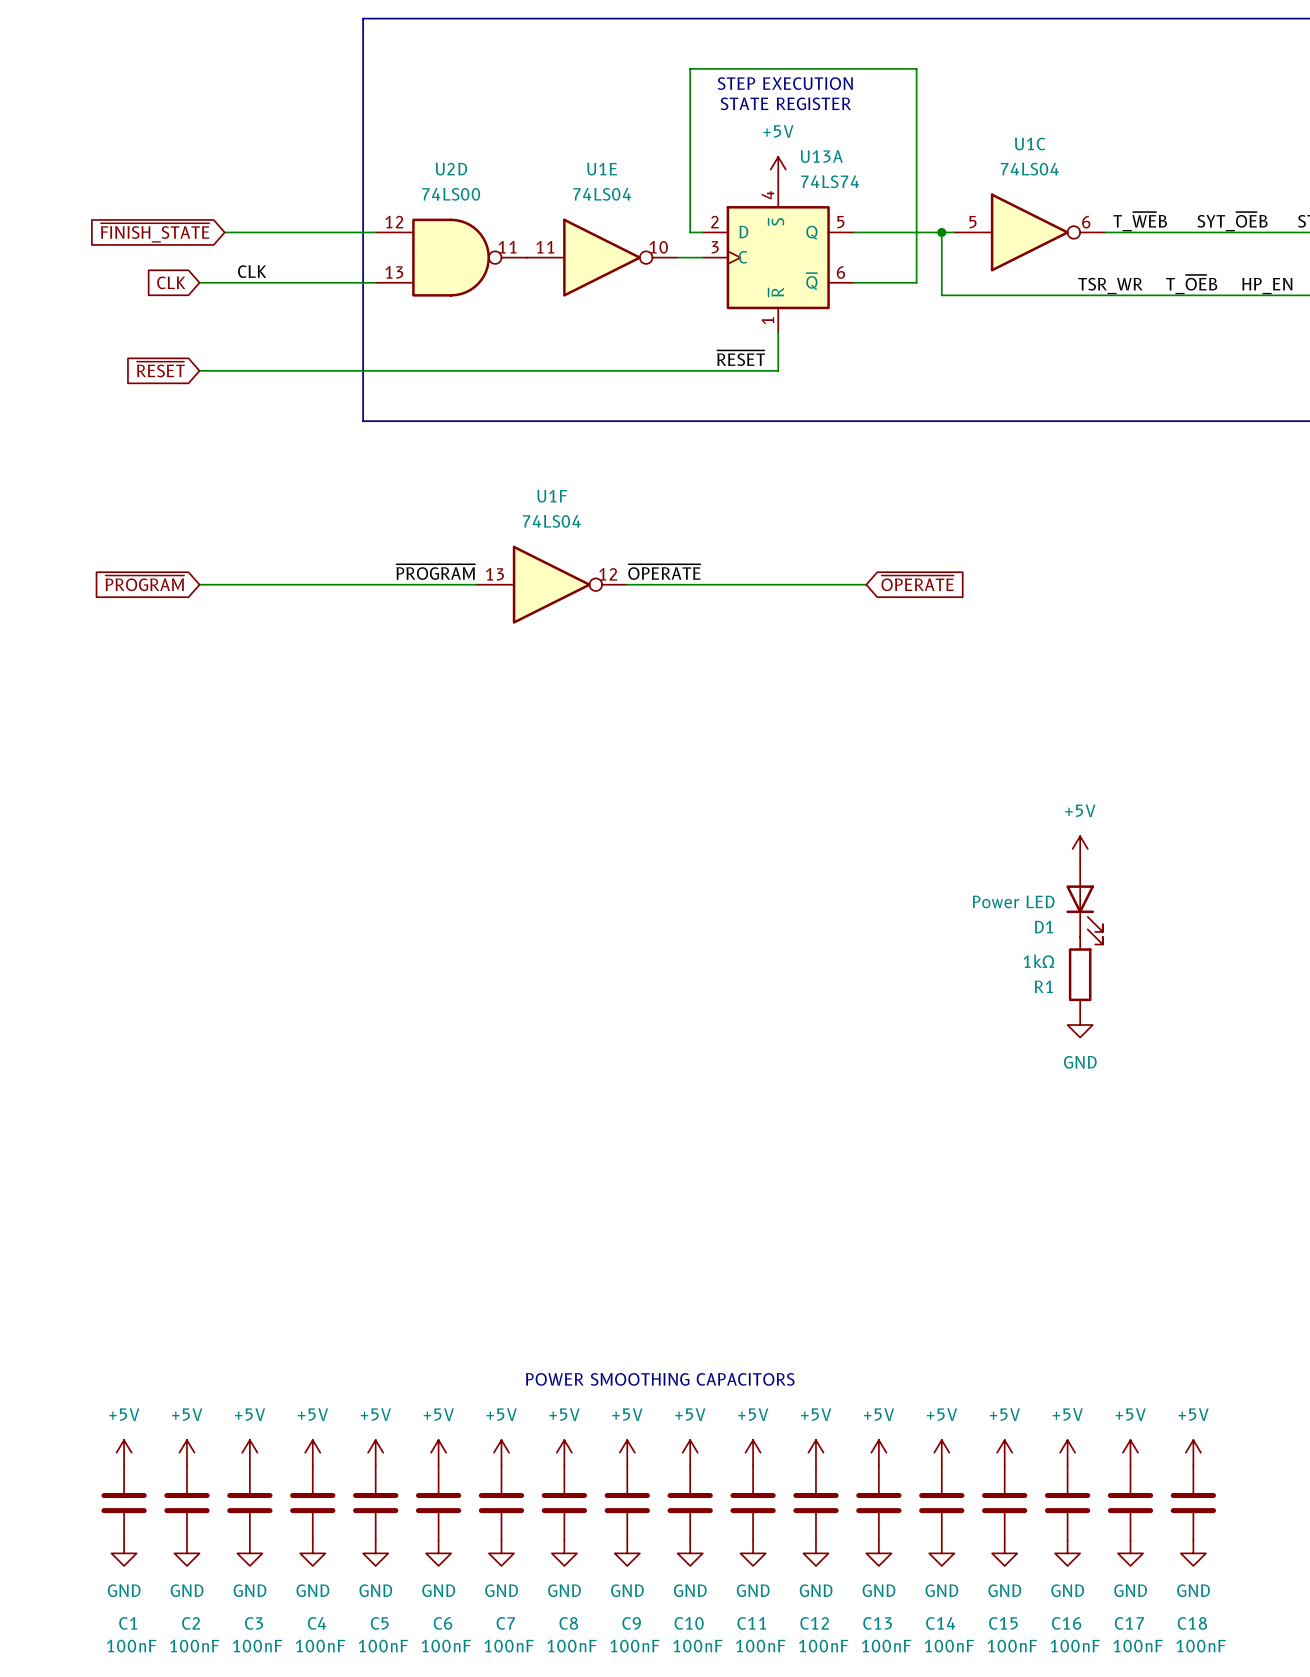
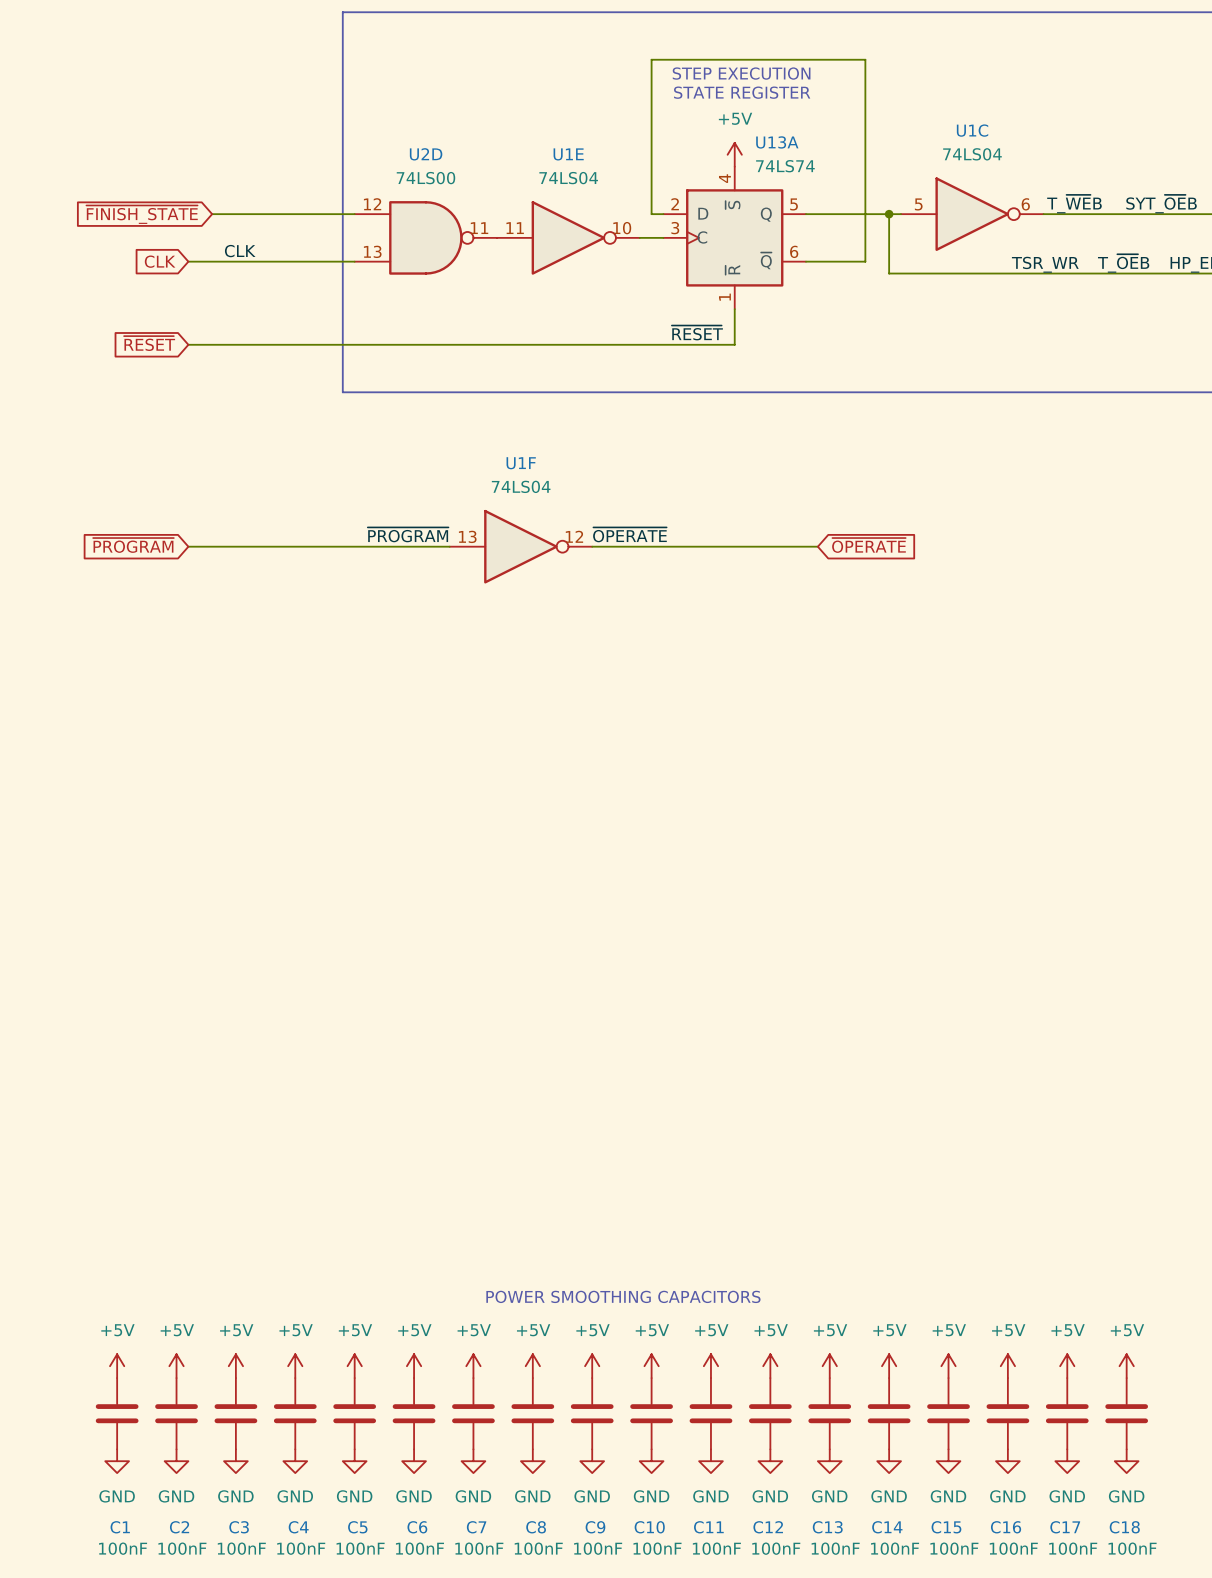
power symbol: +5V (1080, 848) -> none
D1: Power LED (1084, 902) -> none
R1: 1kΩ (1080, 974) -> none
power symbol: GND (1080, 1025) -> none

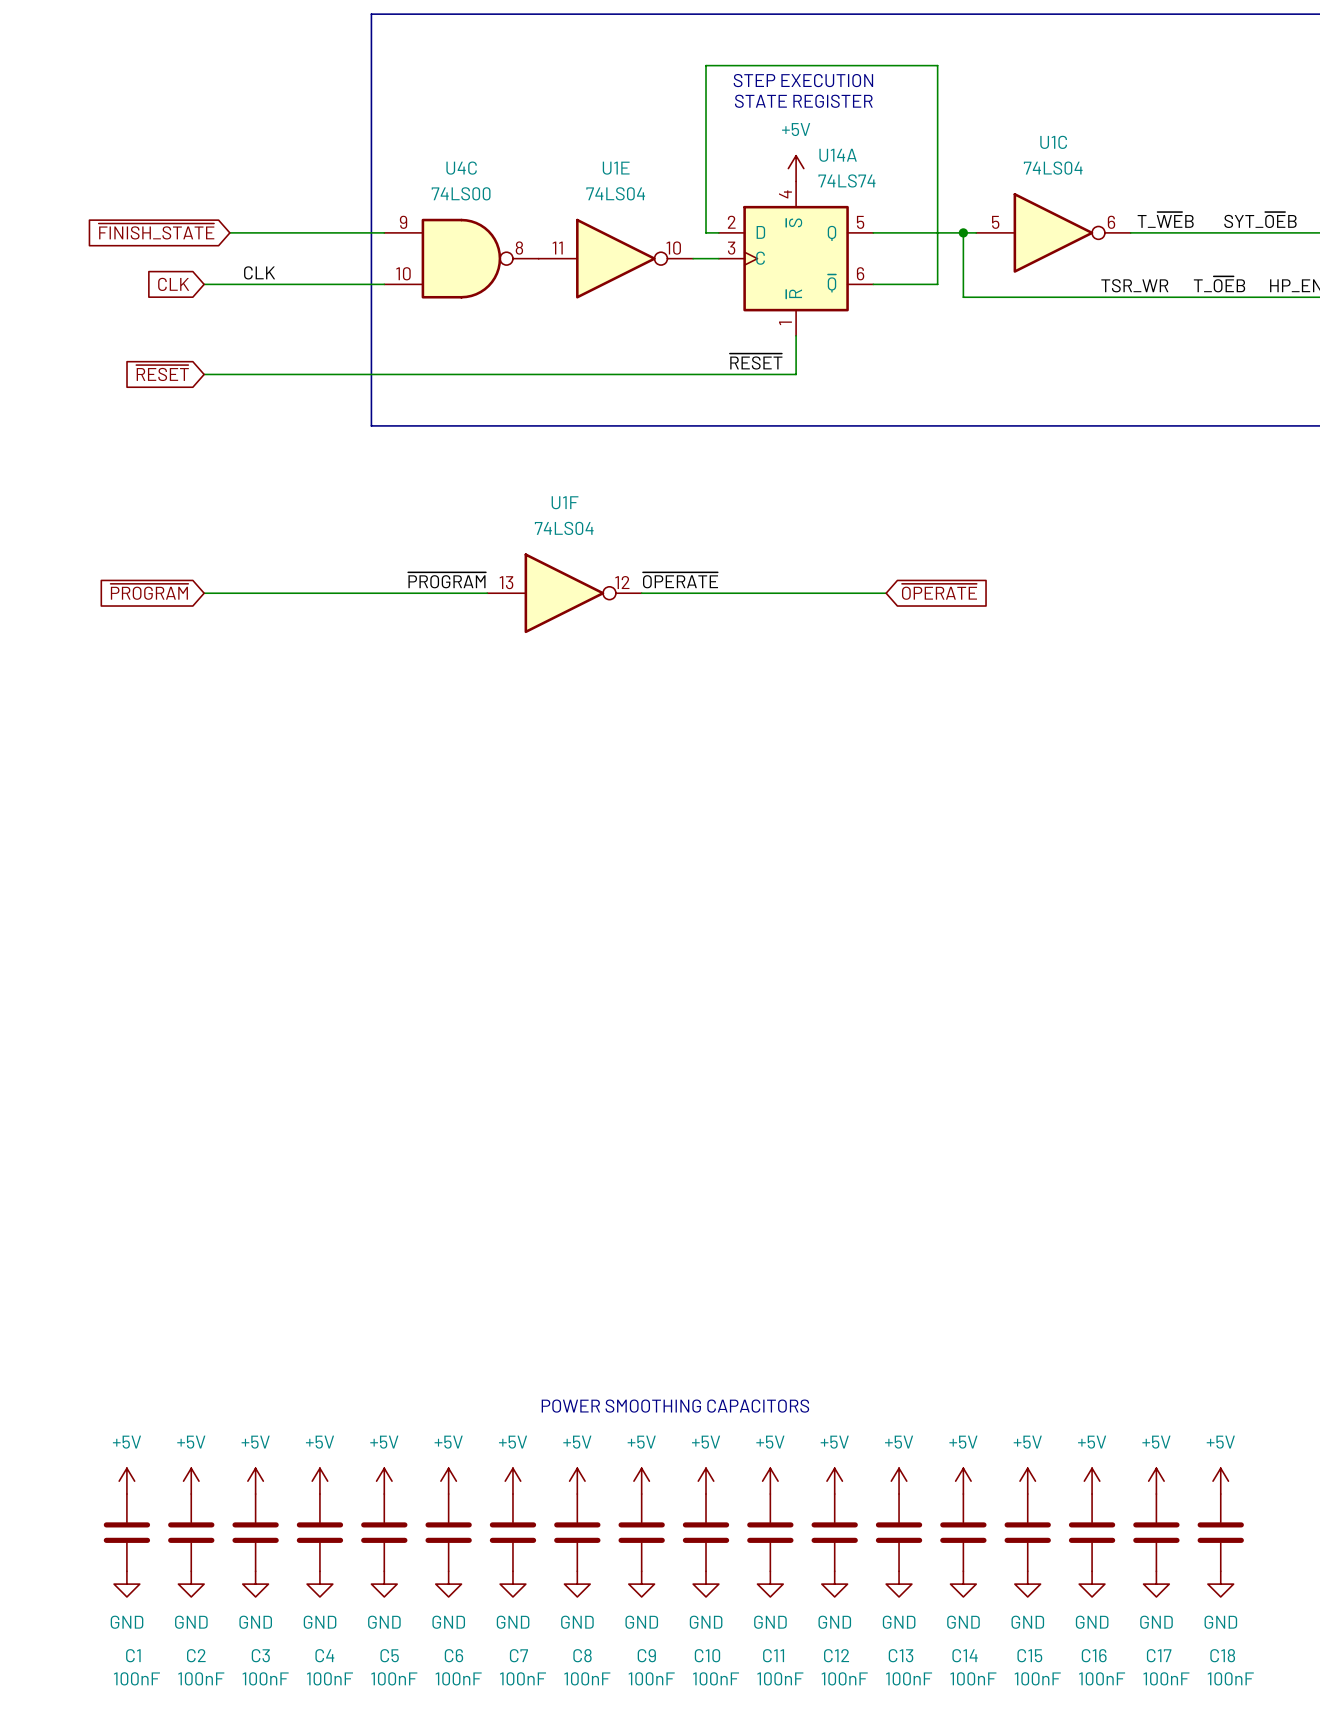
U13A name: U13A (777, 142) -> U14A (838, 155)
U2D name: U2D (426, 154) -> U4C (461, 168)
U2D pin number: 12 (372, 204) -> 9 (403, 222)
U2D pin number: 11 (479, 228) -> 8 (519, 248)
U2D pin number: 13 (372, 251) -> 10 (403, 273)

